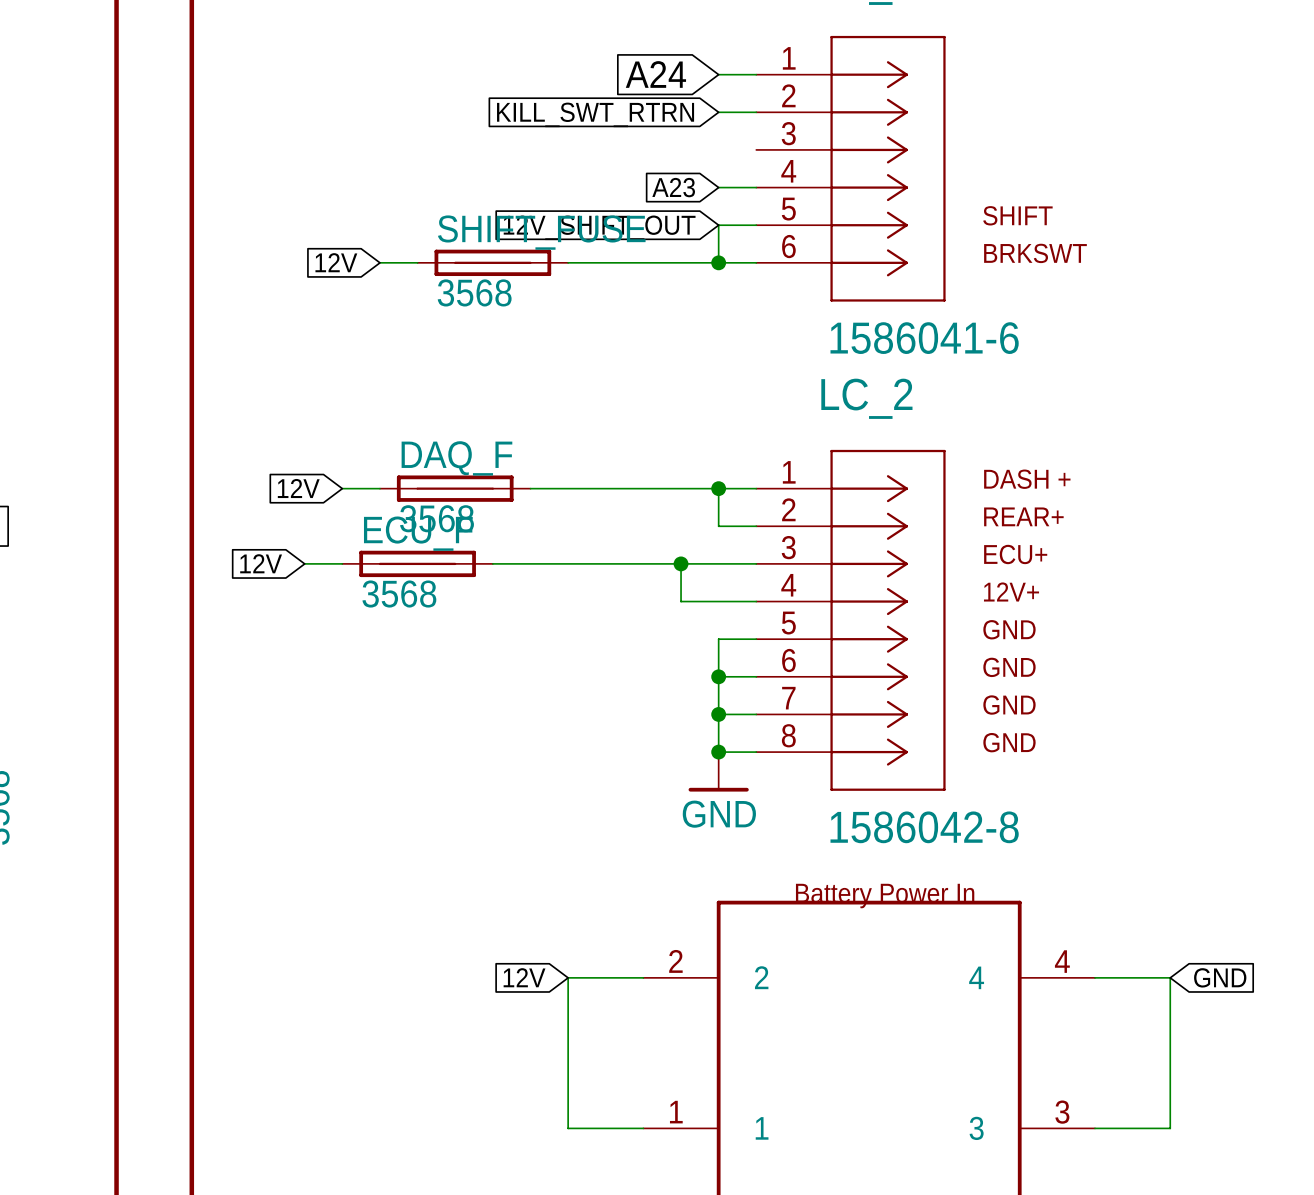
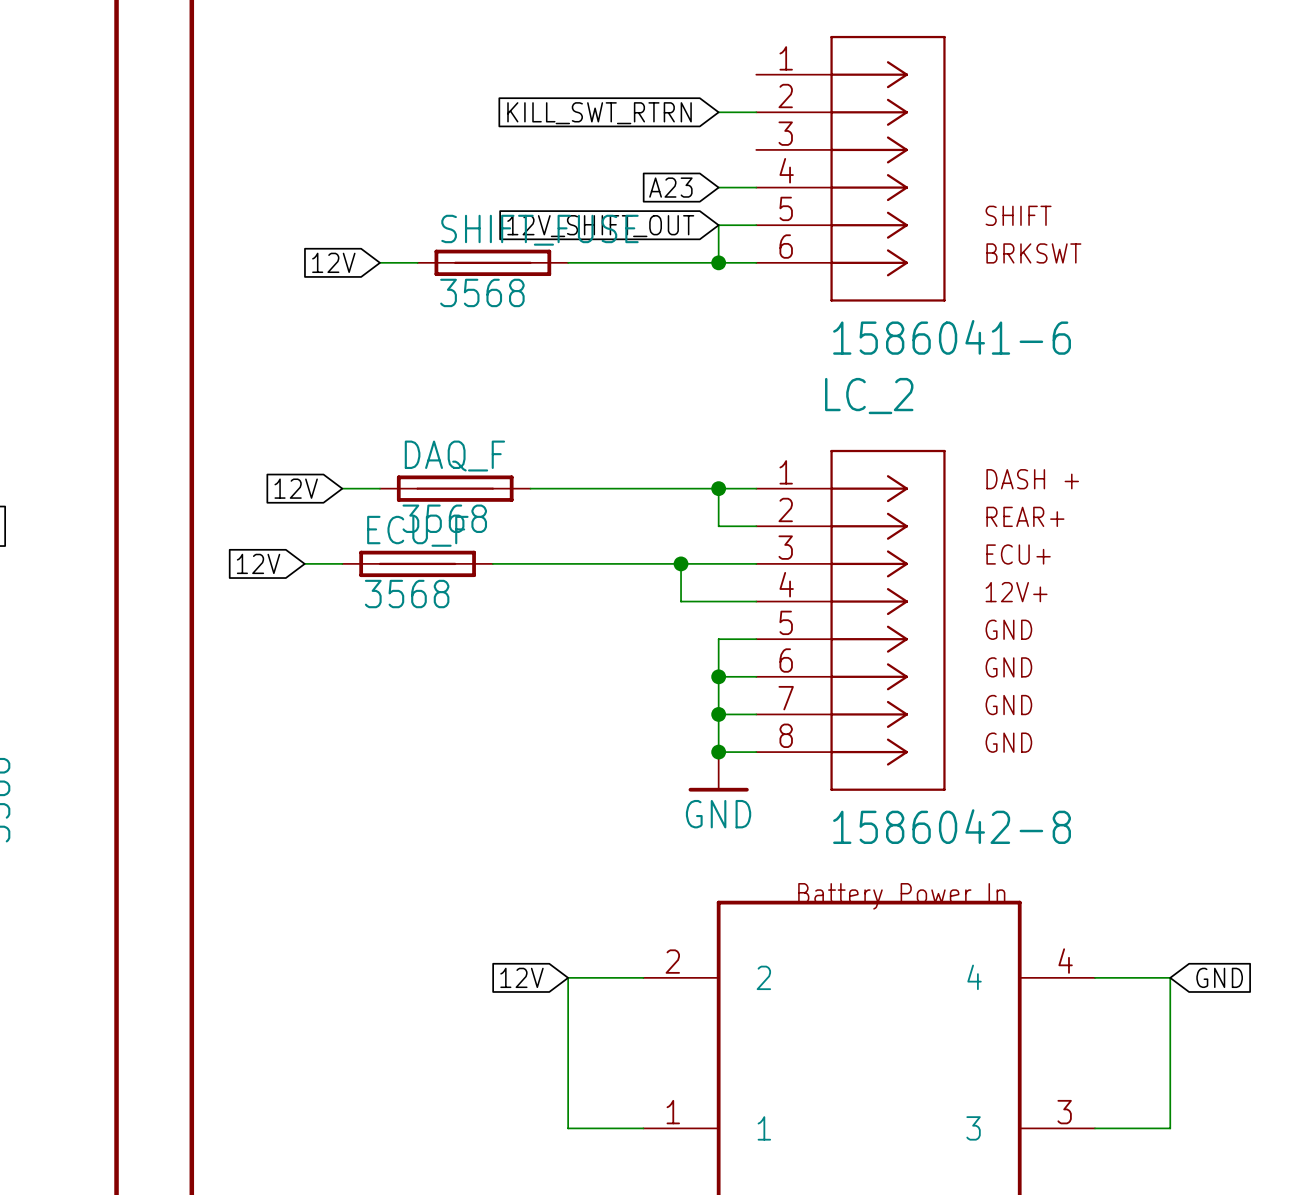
global label: A24 (655, 74) -> none
wire: (718, 74) (756, 74) -> none

